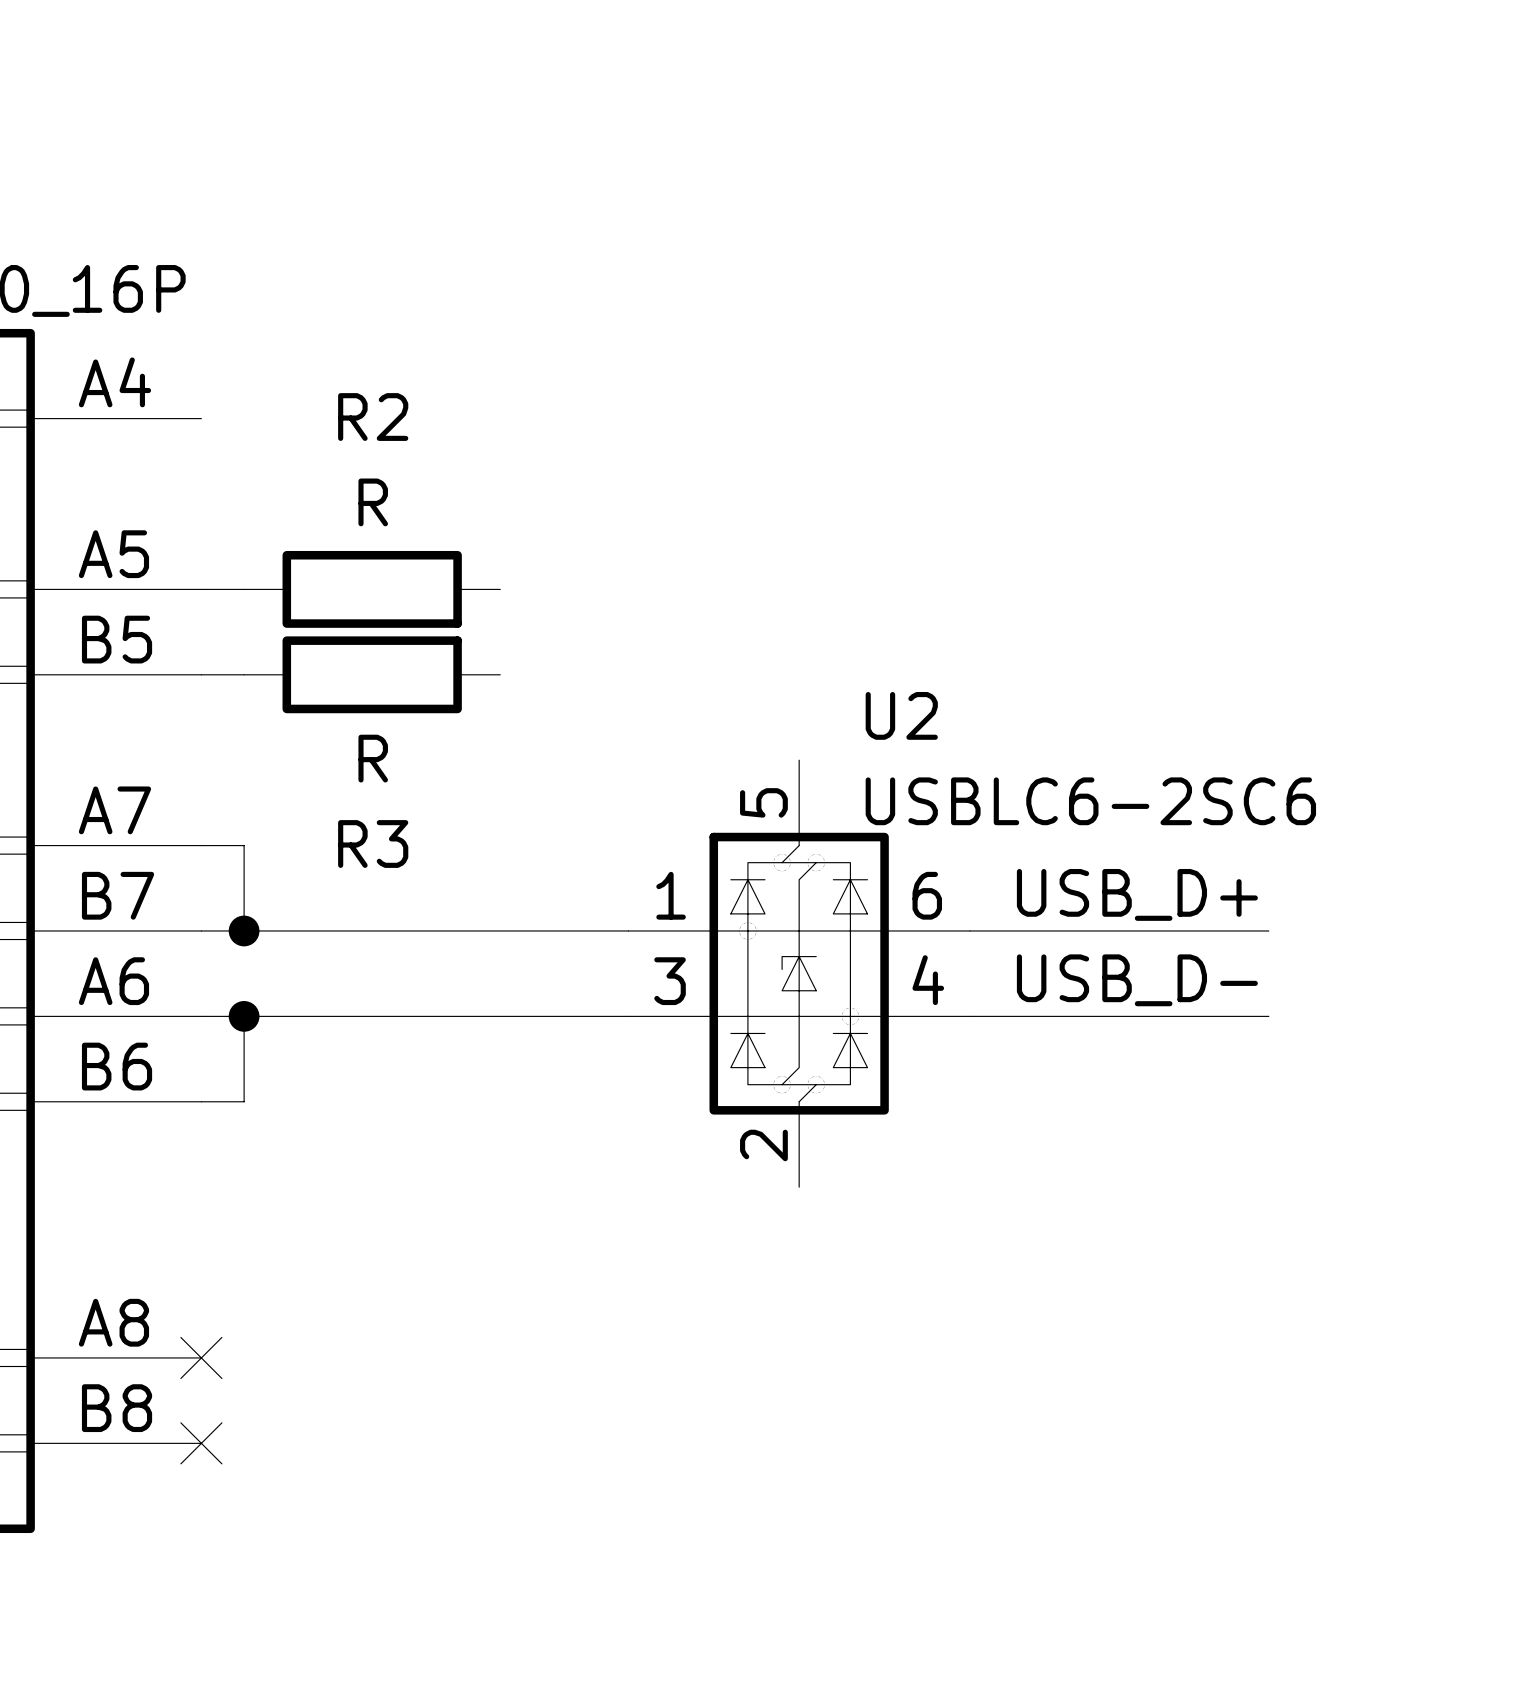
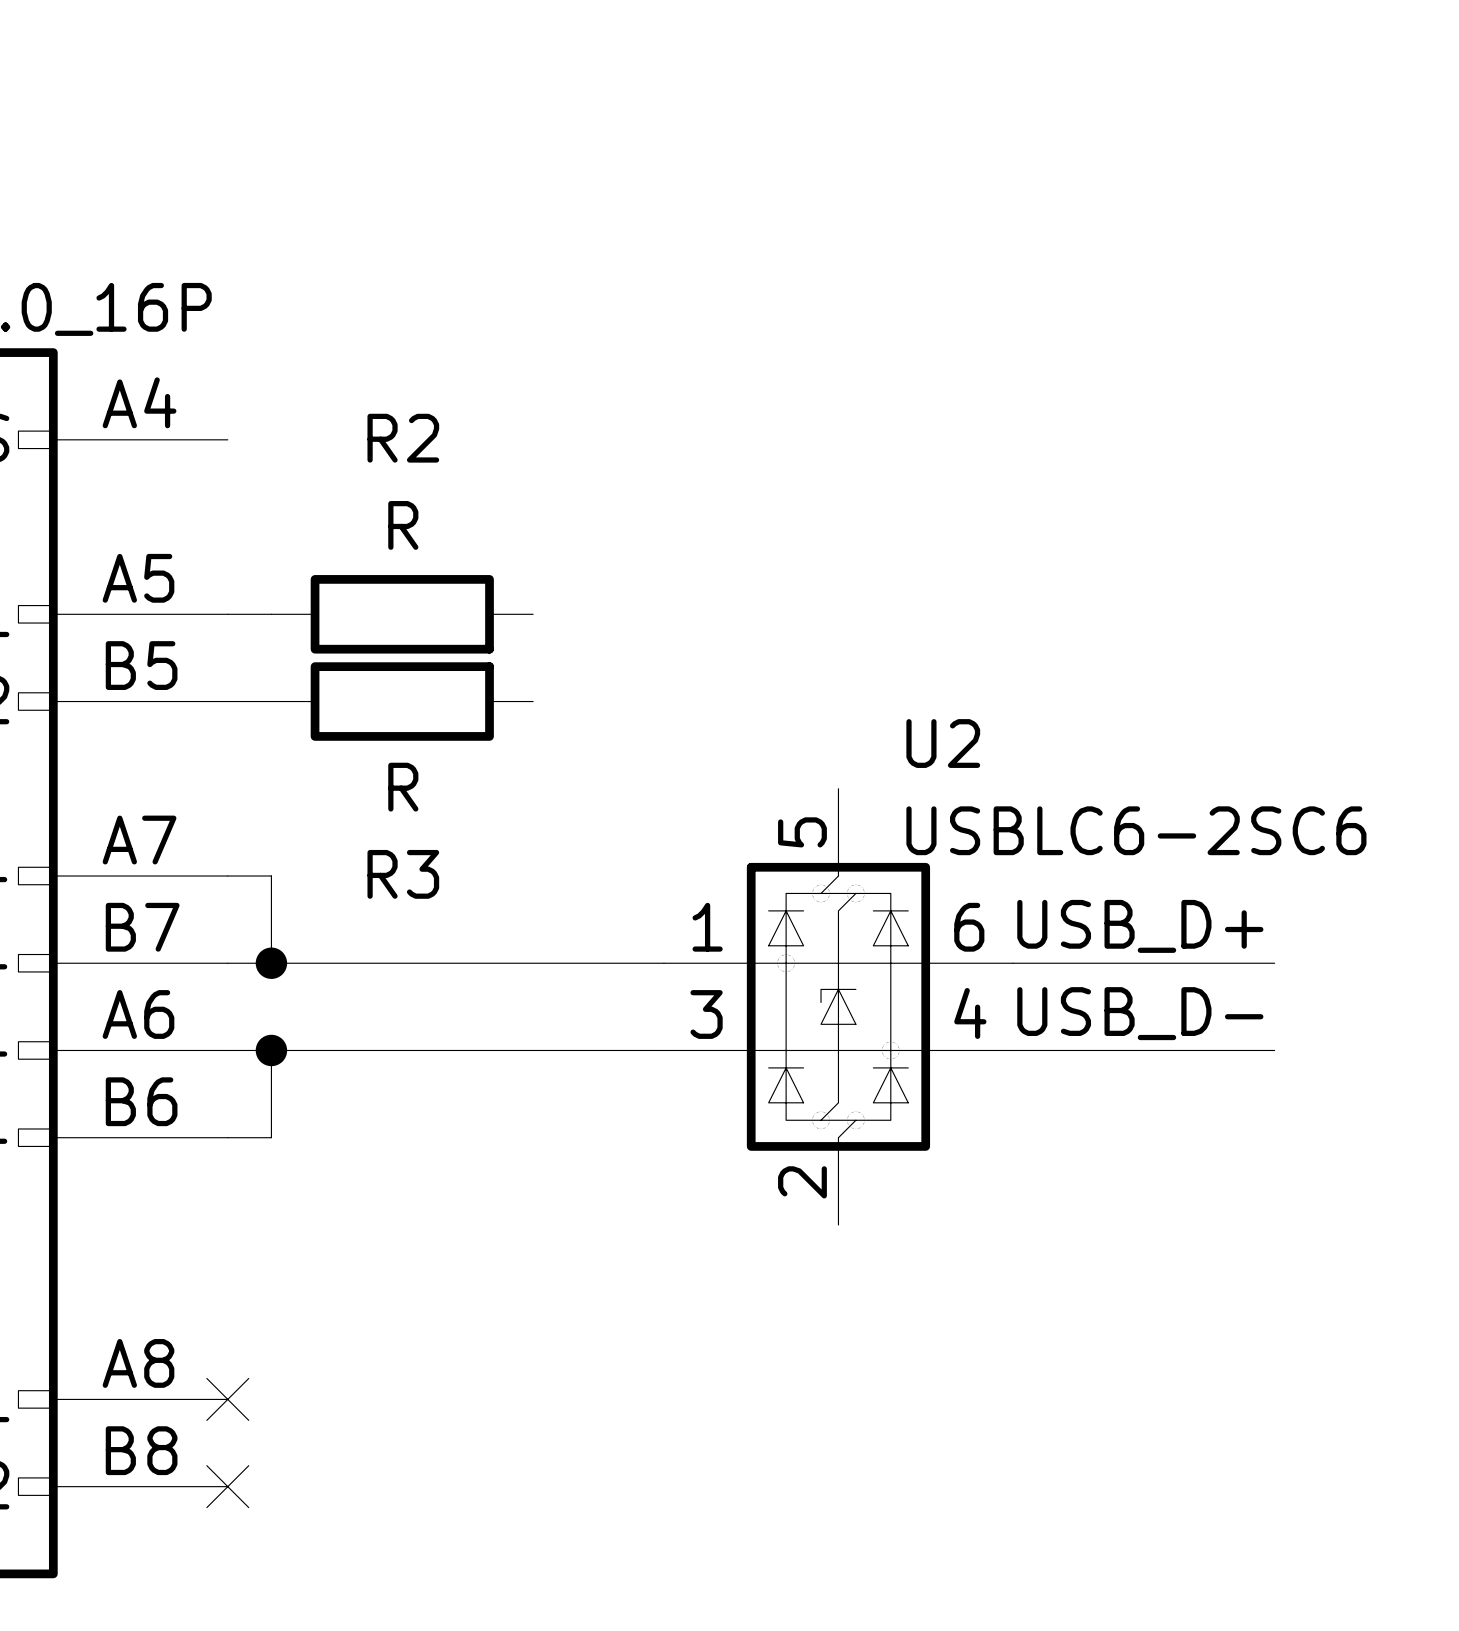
label position: USB_D+ (1137, 894) -> USB_D+ (1140, 926)
wire: (1226, 930) (1268, 930) -> none
label position: USB_D- (1137, 980) -> USB_D- (1140, 1013)
wire: (1226, 1016) (1268, 1016) -> none

